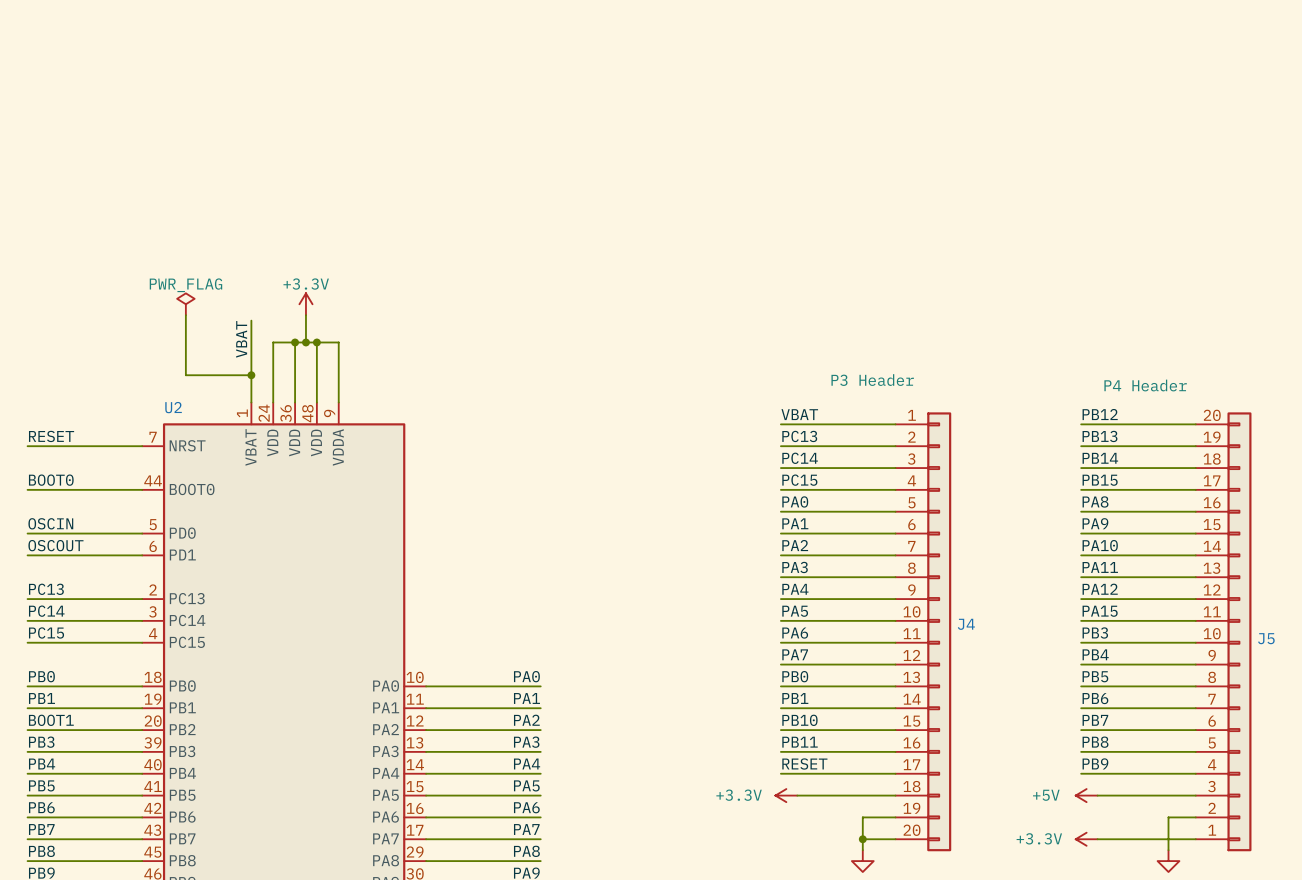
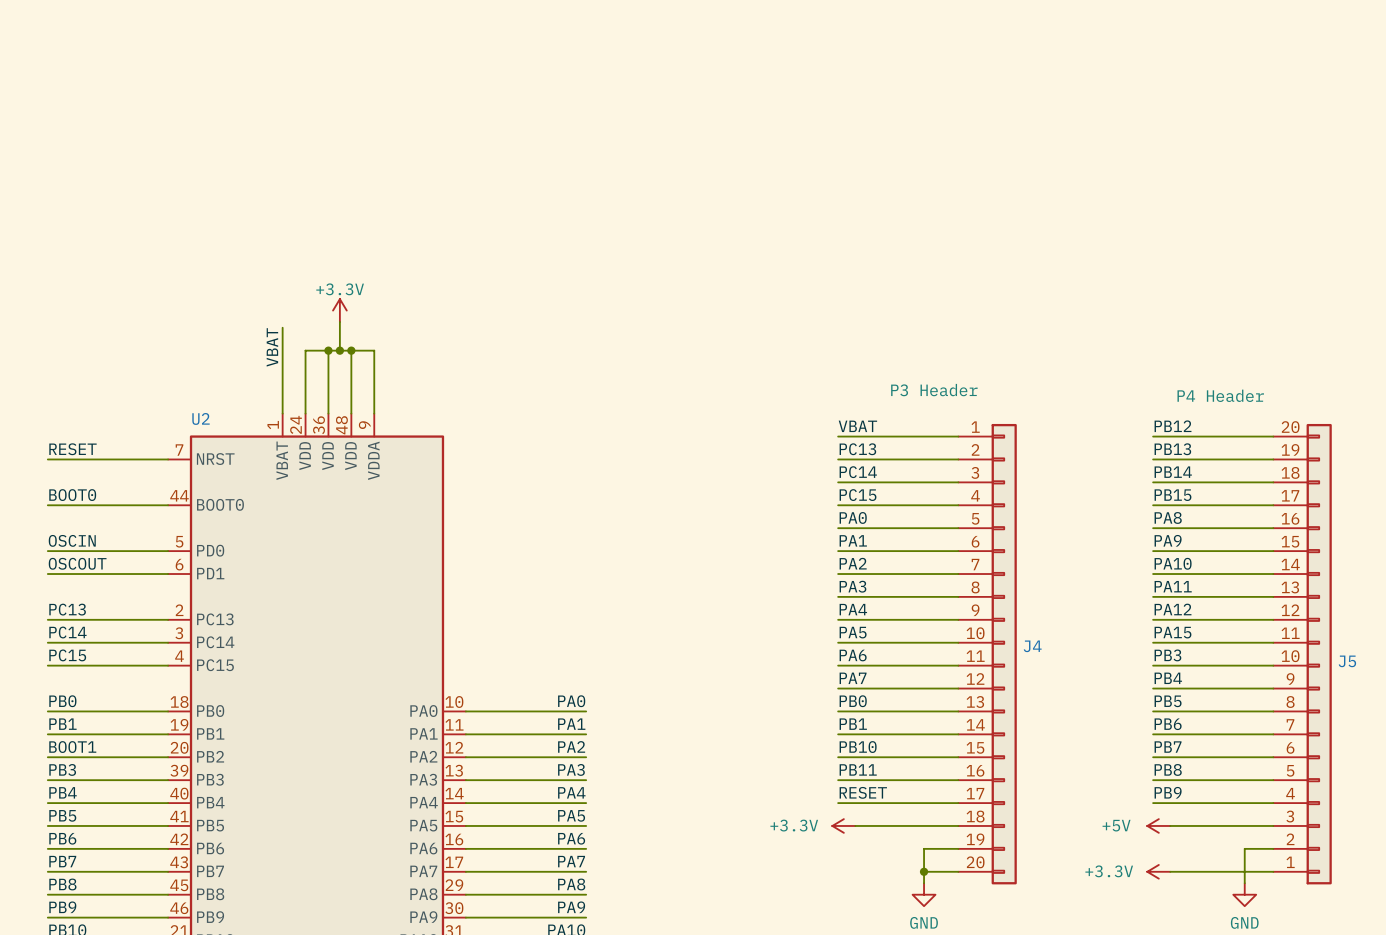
power symbol: PWR_FLAG (185, 304) -> none
wire: (185, 315) (185, 375) (251, 375) -> none
junction: (251, 375) -> none

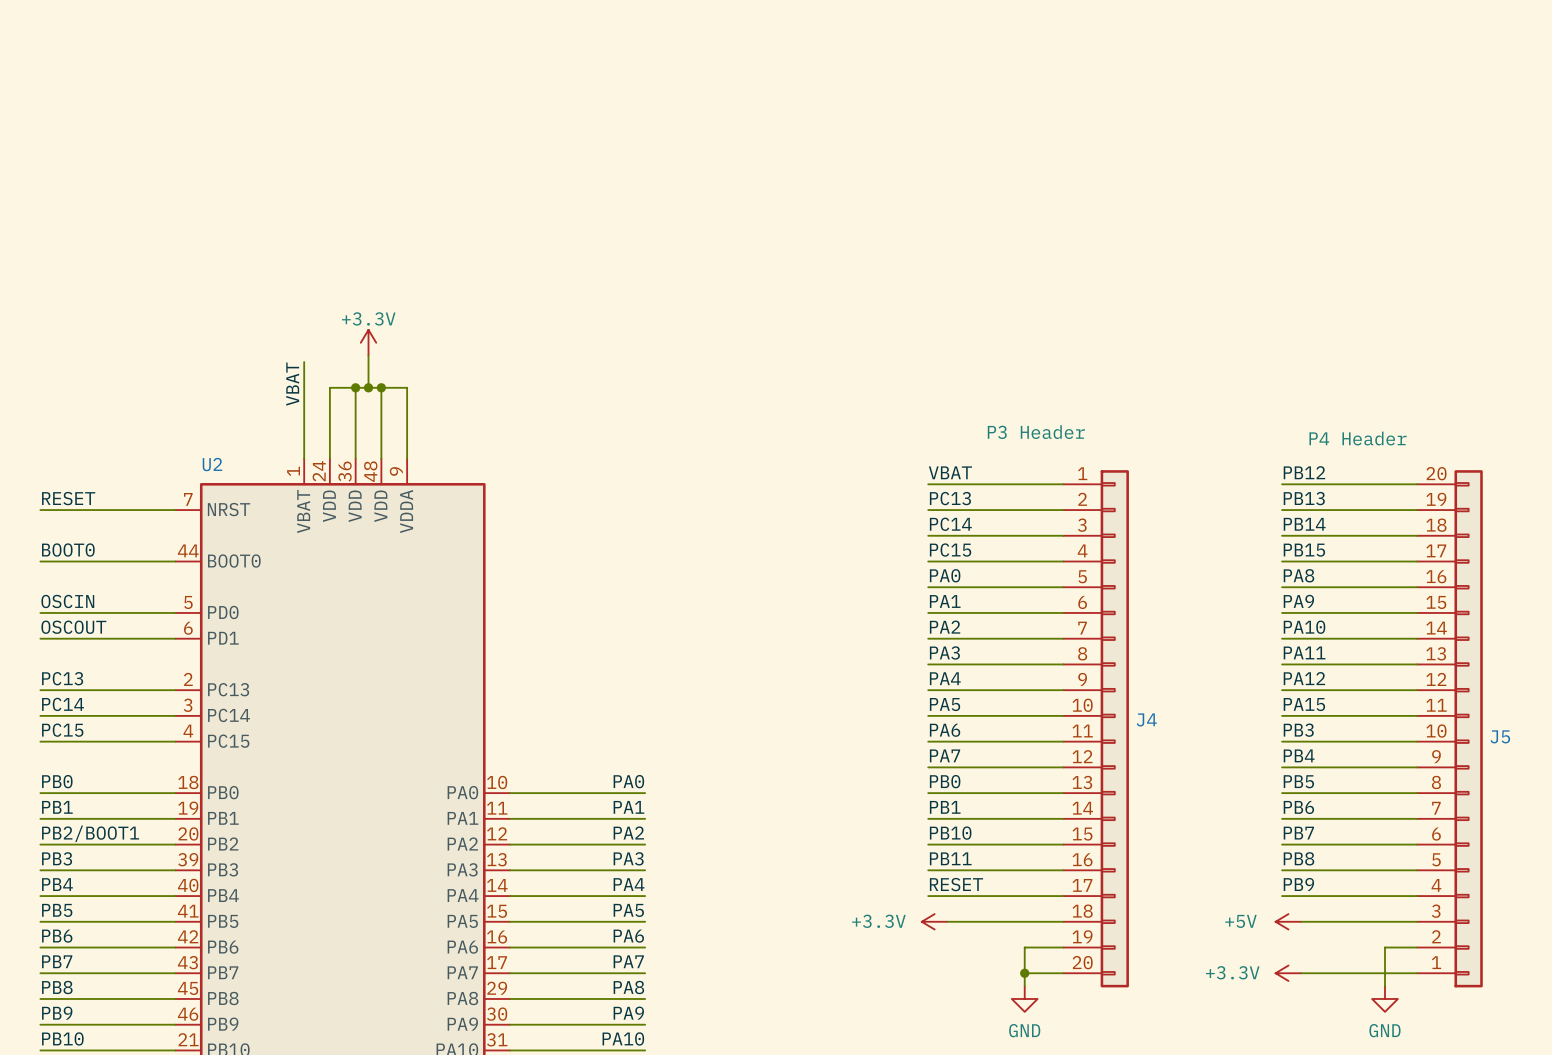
label: BOOT1 (72, 747) -> PB2/BOOT1 (90, 833)

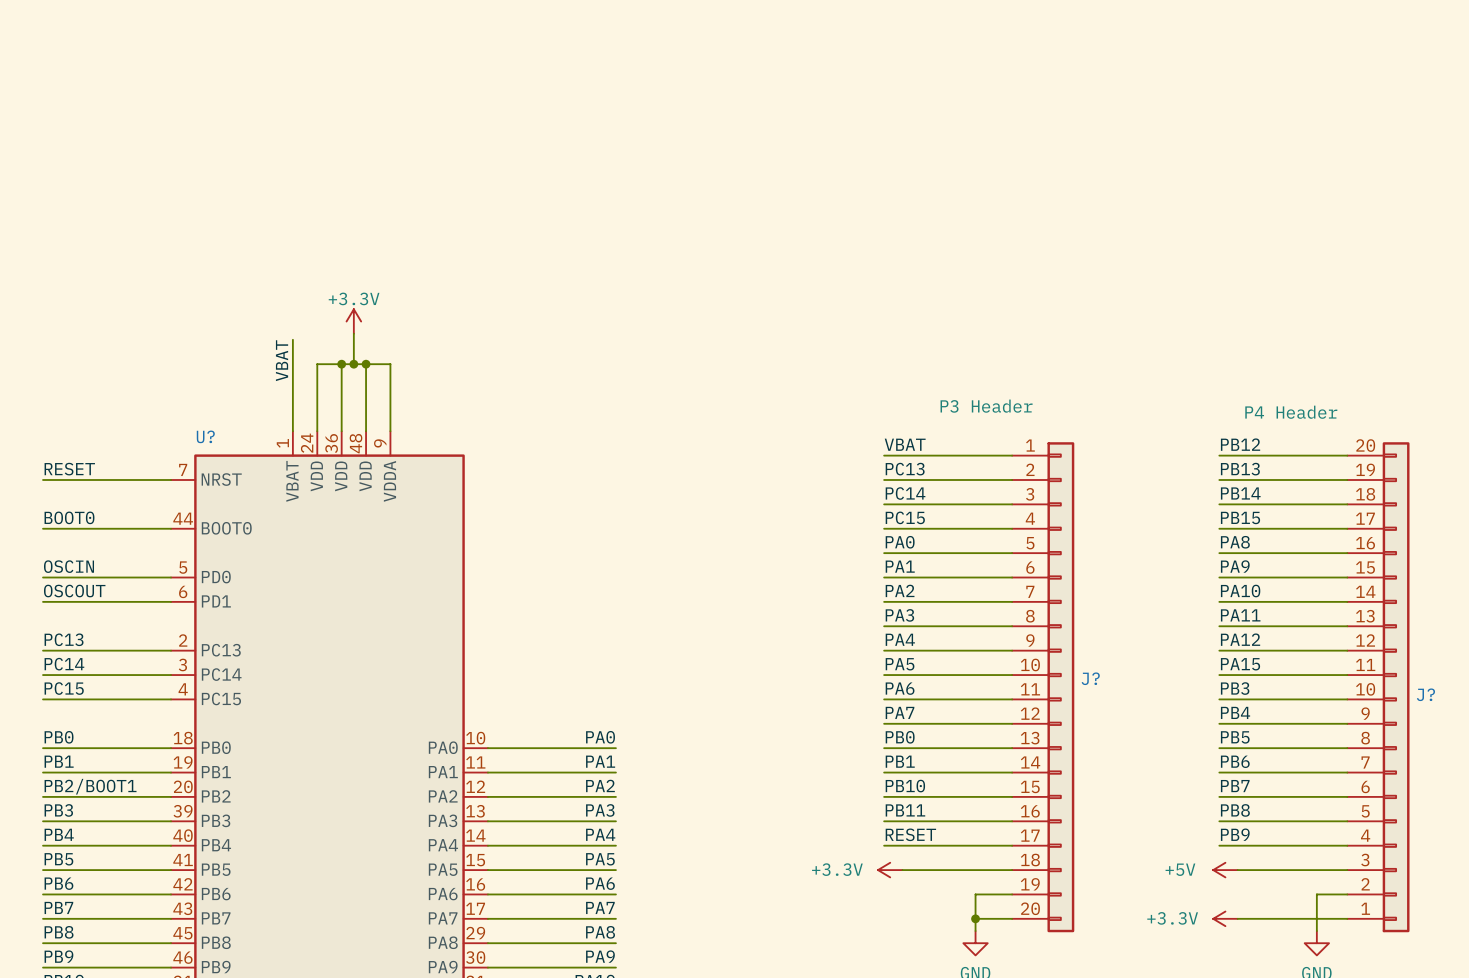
U2 name: U2 (212, 464) -> U? (205, 436)
J4 name: J4 (1146, 719) -> J? (1090, 678)
J5 name: J5 (1500, 736) -> J? (1425, 694)

